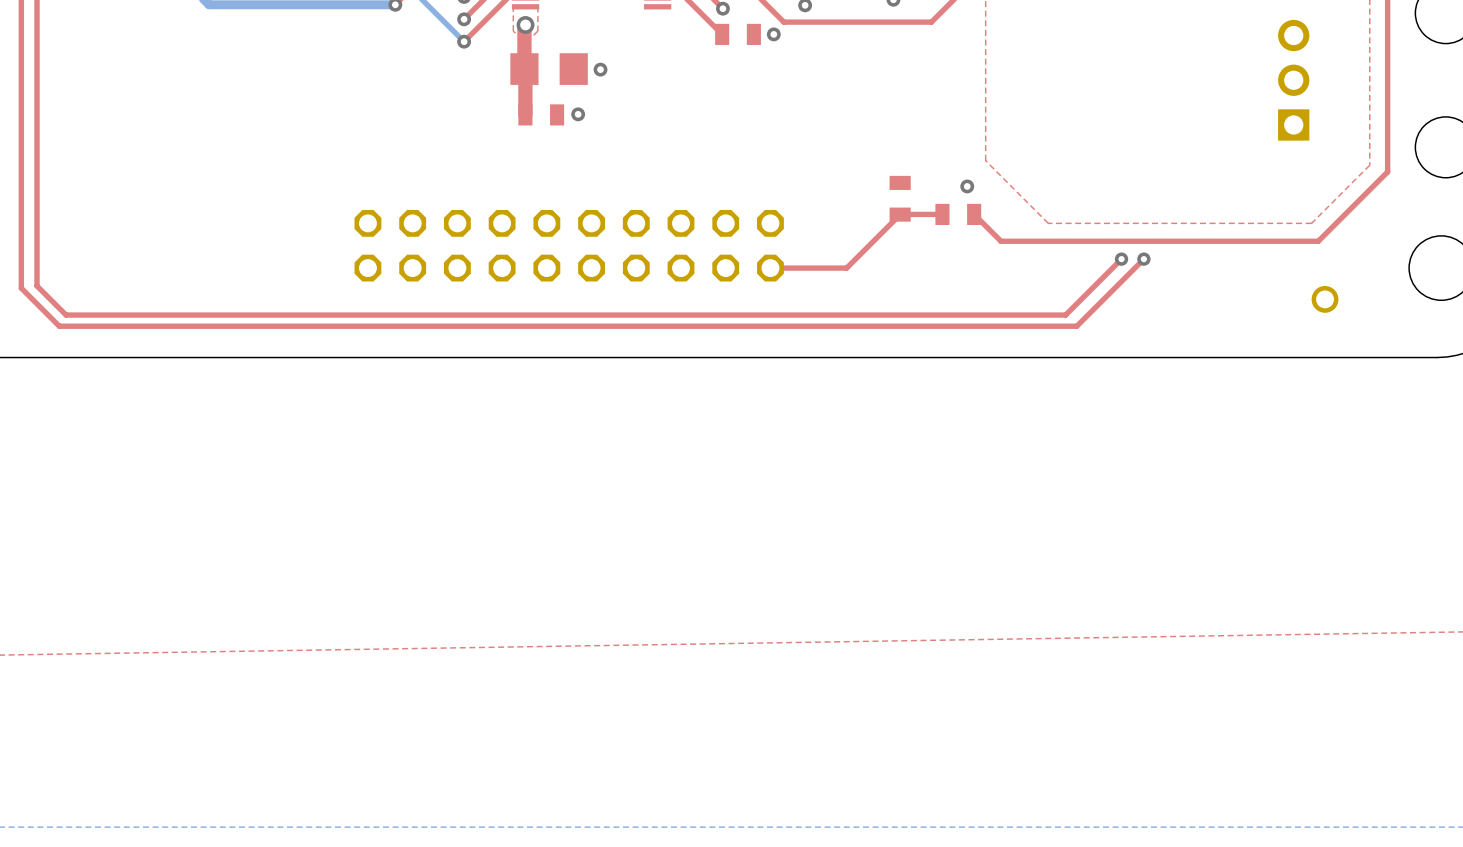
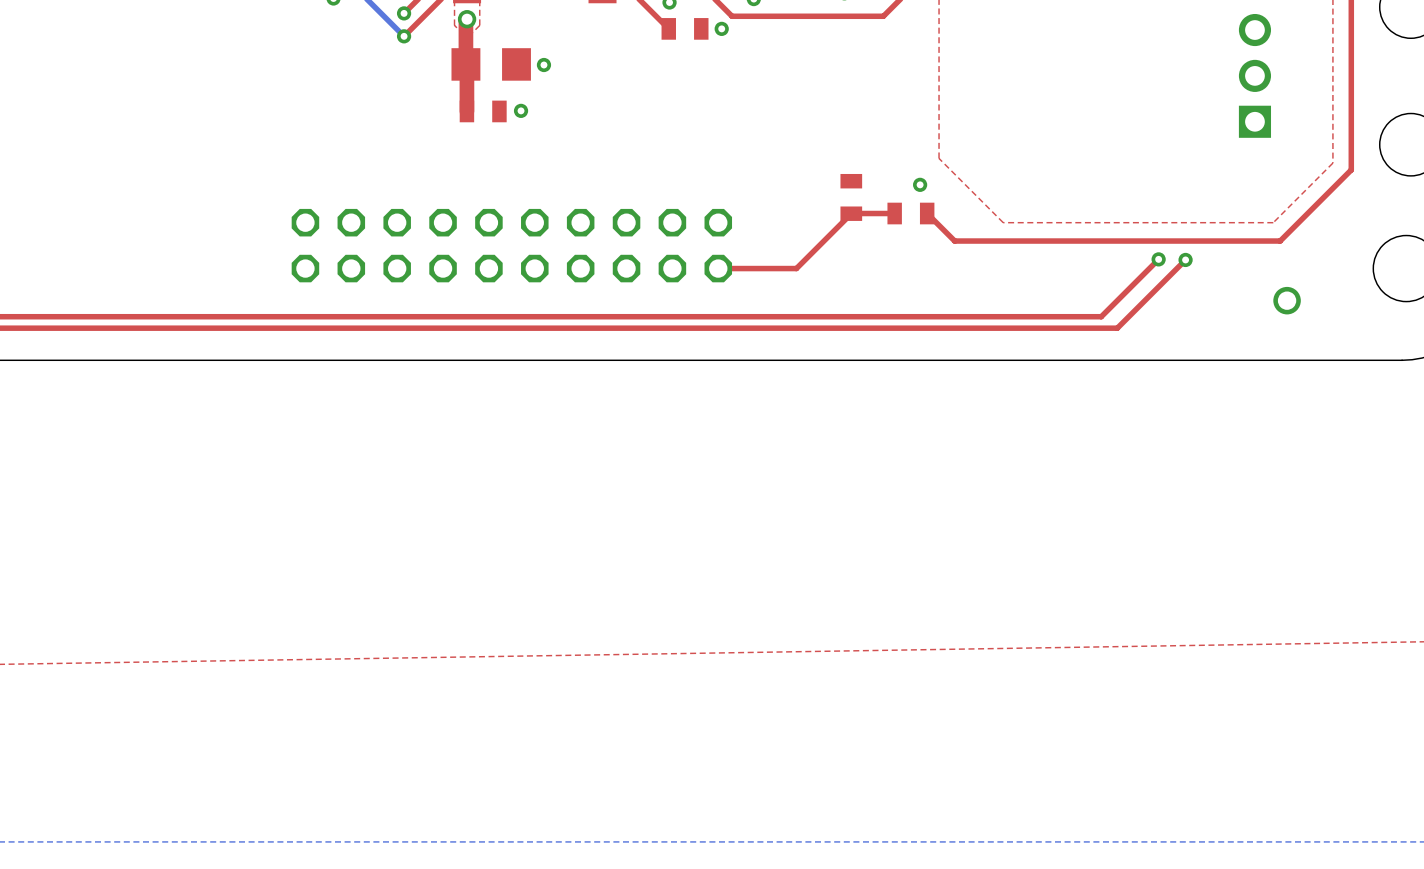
top track: (1121, 259) (1065, 315) -> (1158, 259) (1101, 316) (1021, 316)
via: (1121, 259) -> none
top track: (1143, 259) (1076, 326) -> (1185, 259) (1117, 328) (1032, 328)
via: (1143, 259) -> none
via: none -> (1158, 259)
via: none -> (1185, 259)

